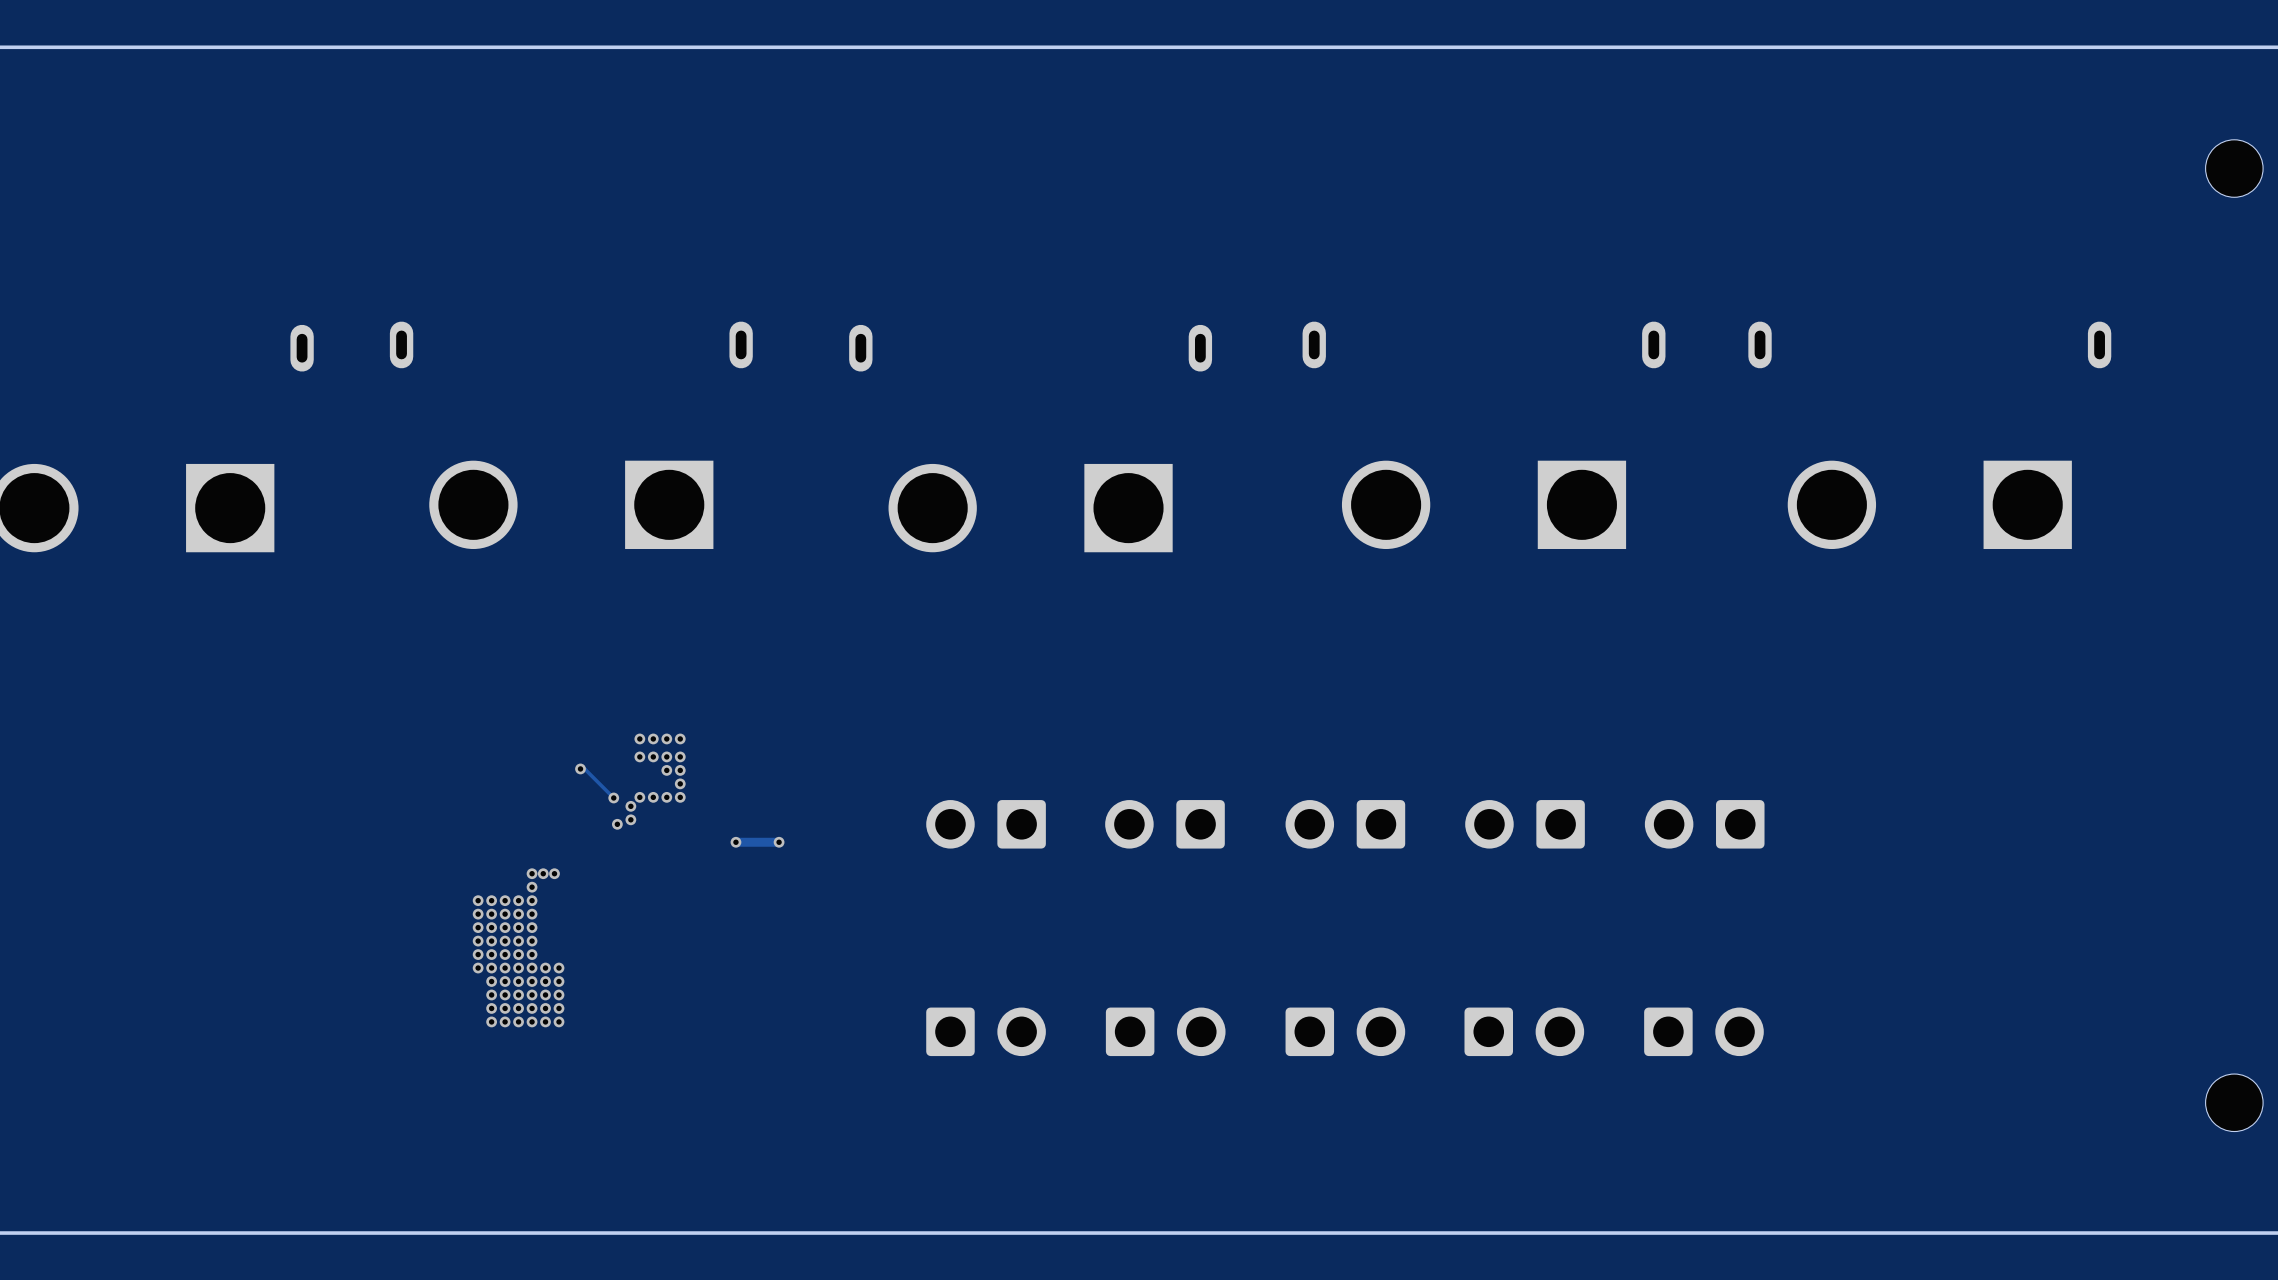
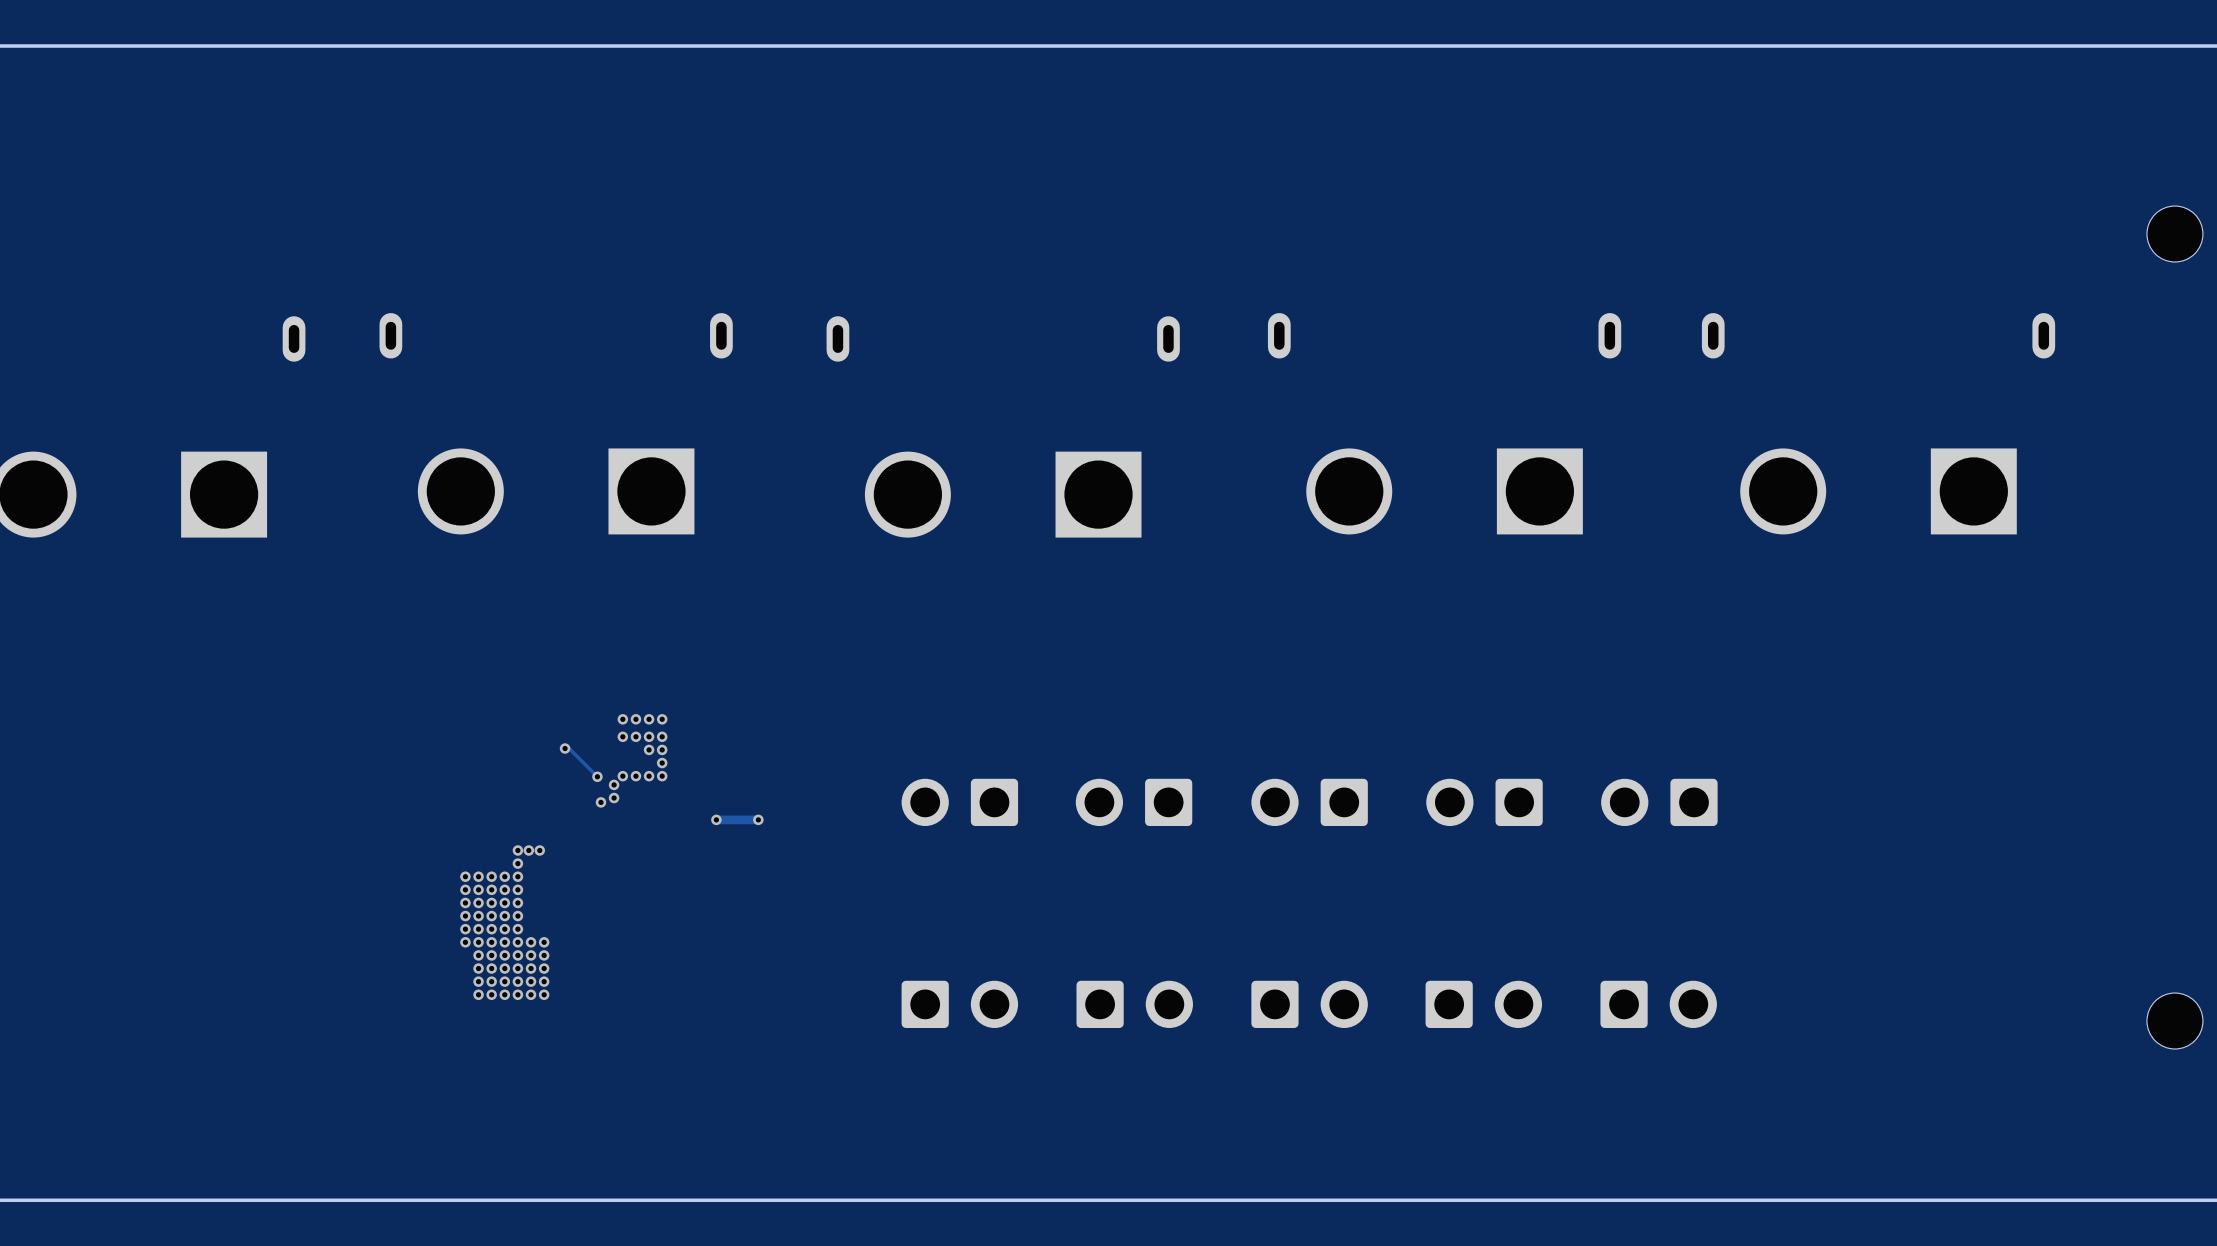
part position: (2234, 168) -> (2174, 234)
part position: (2234, 1102) -> (2174, 1021)

